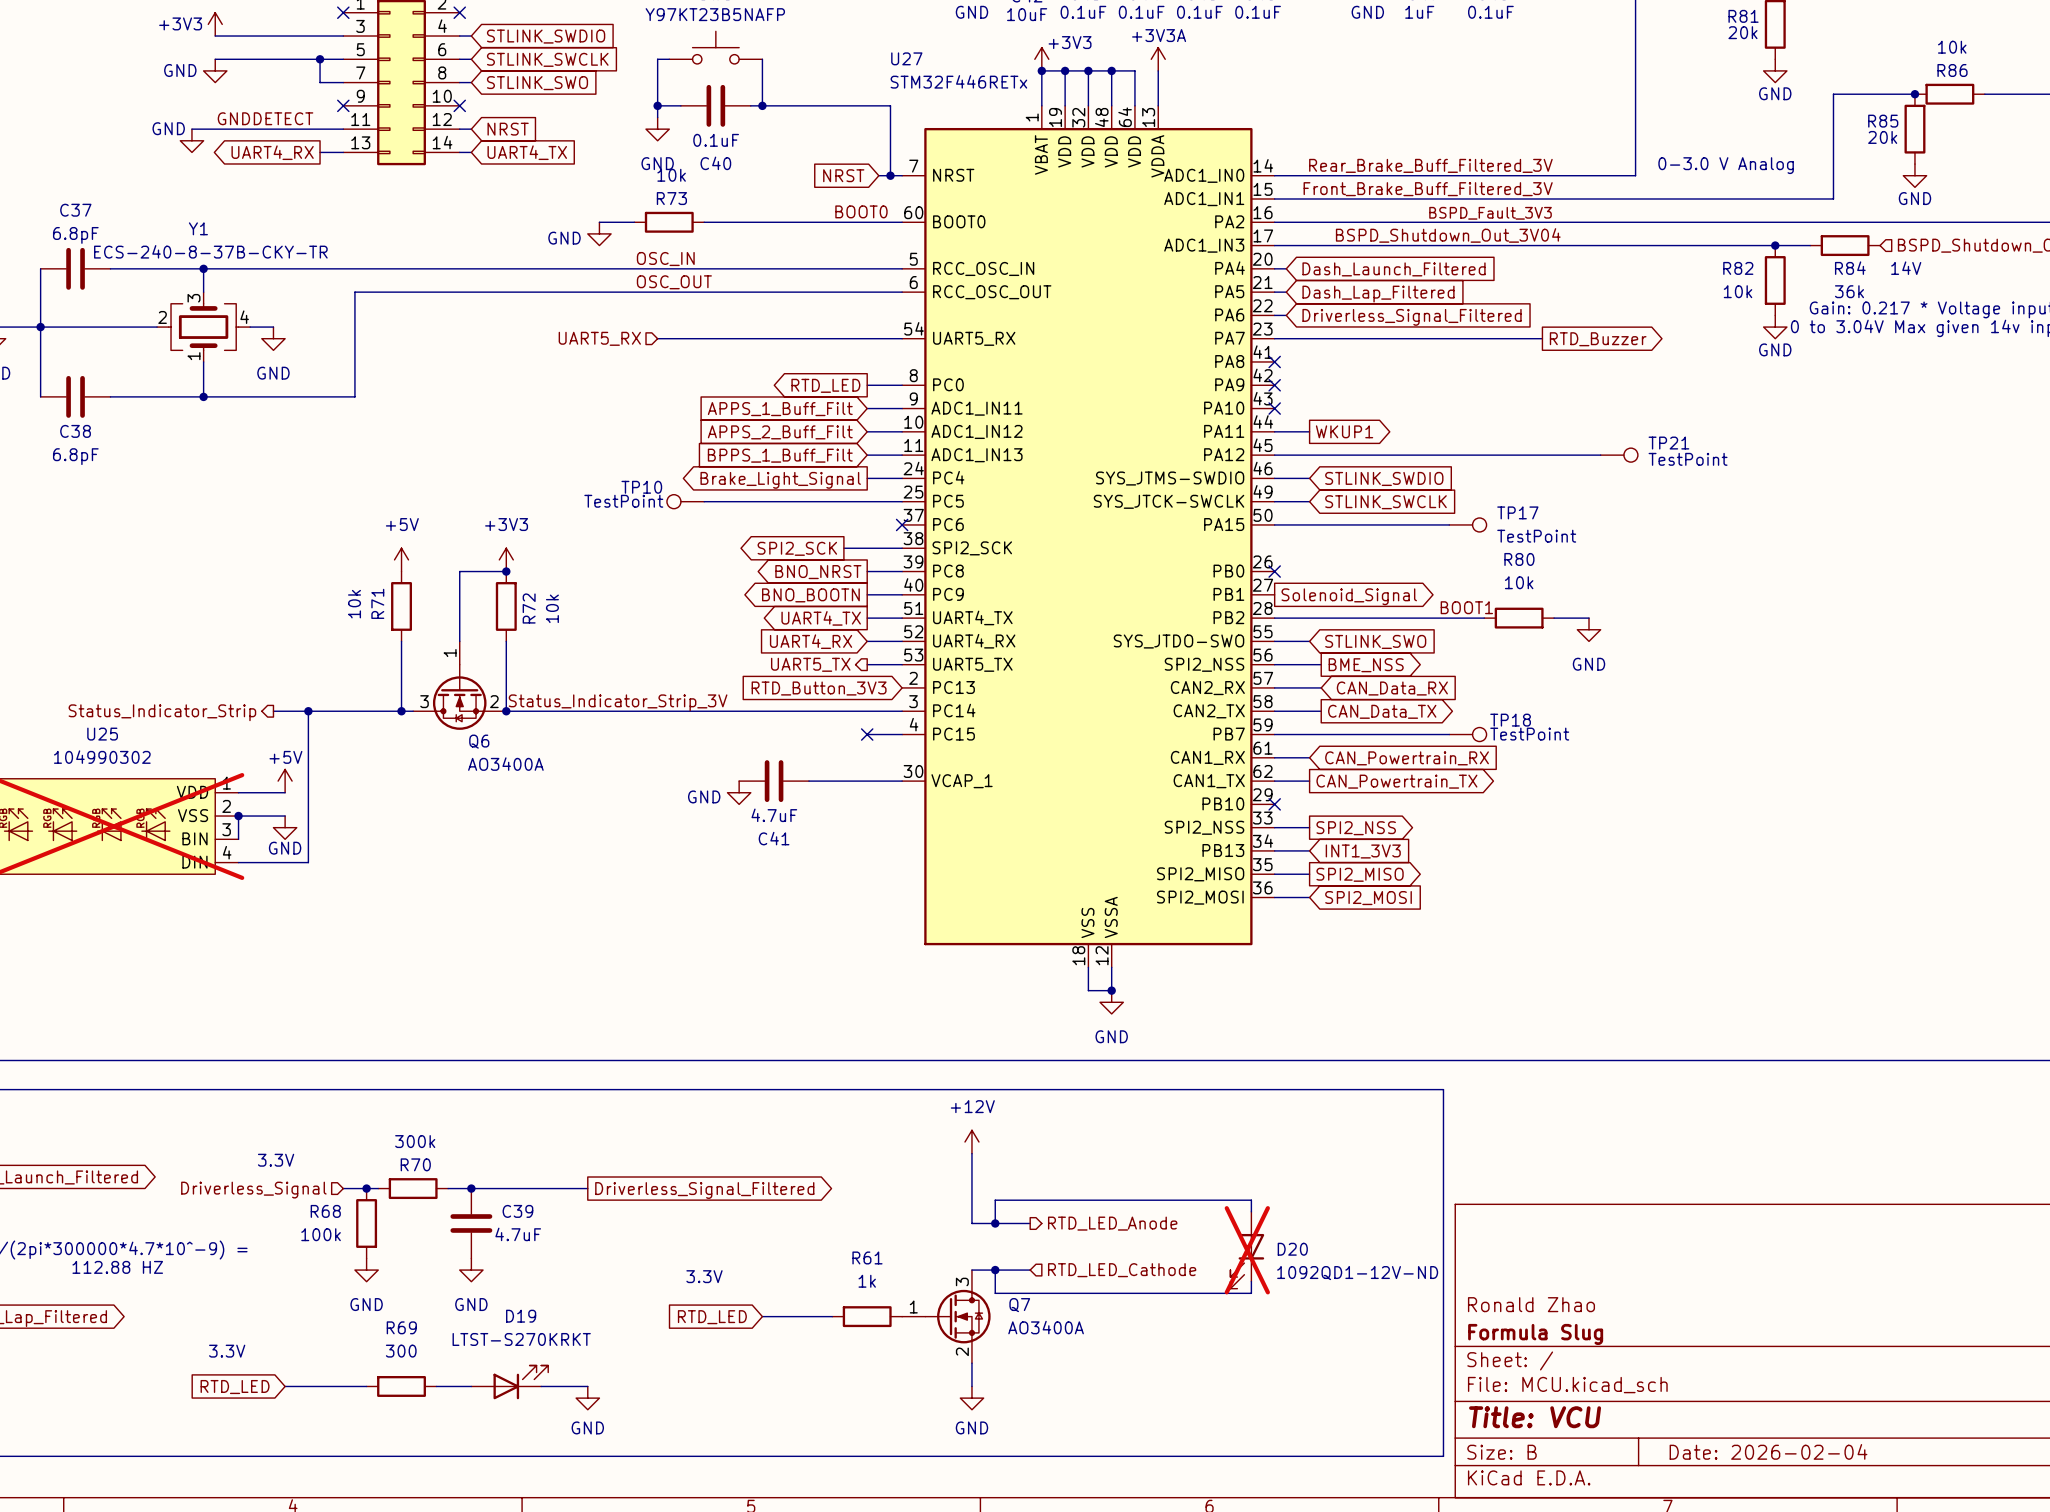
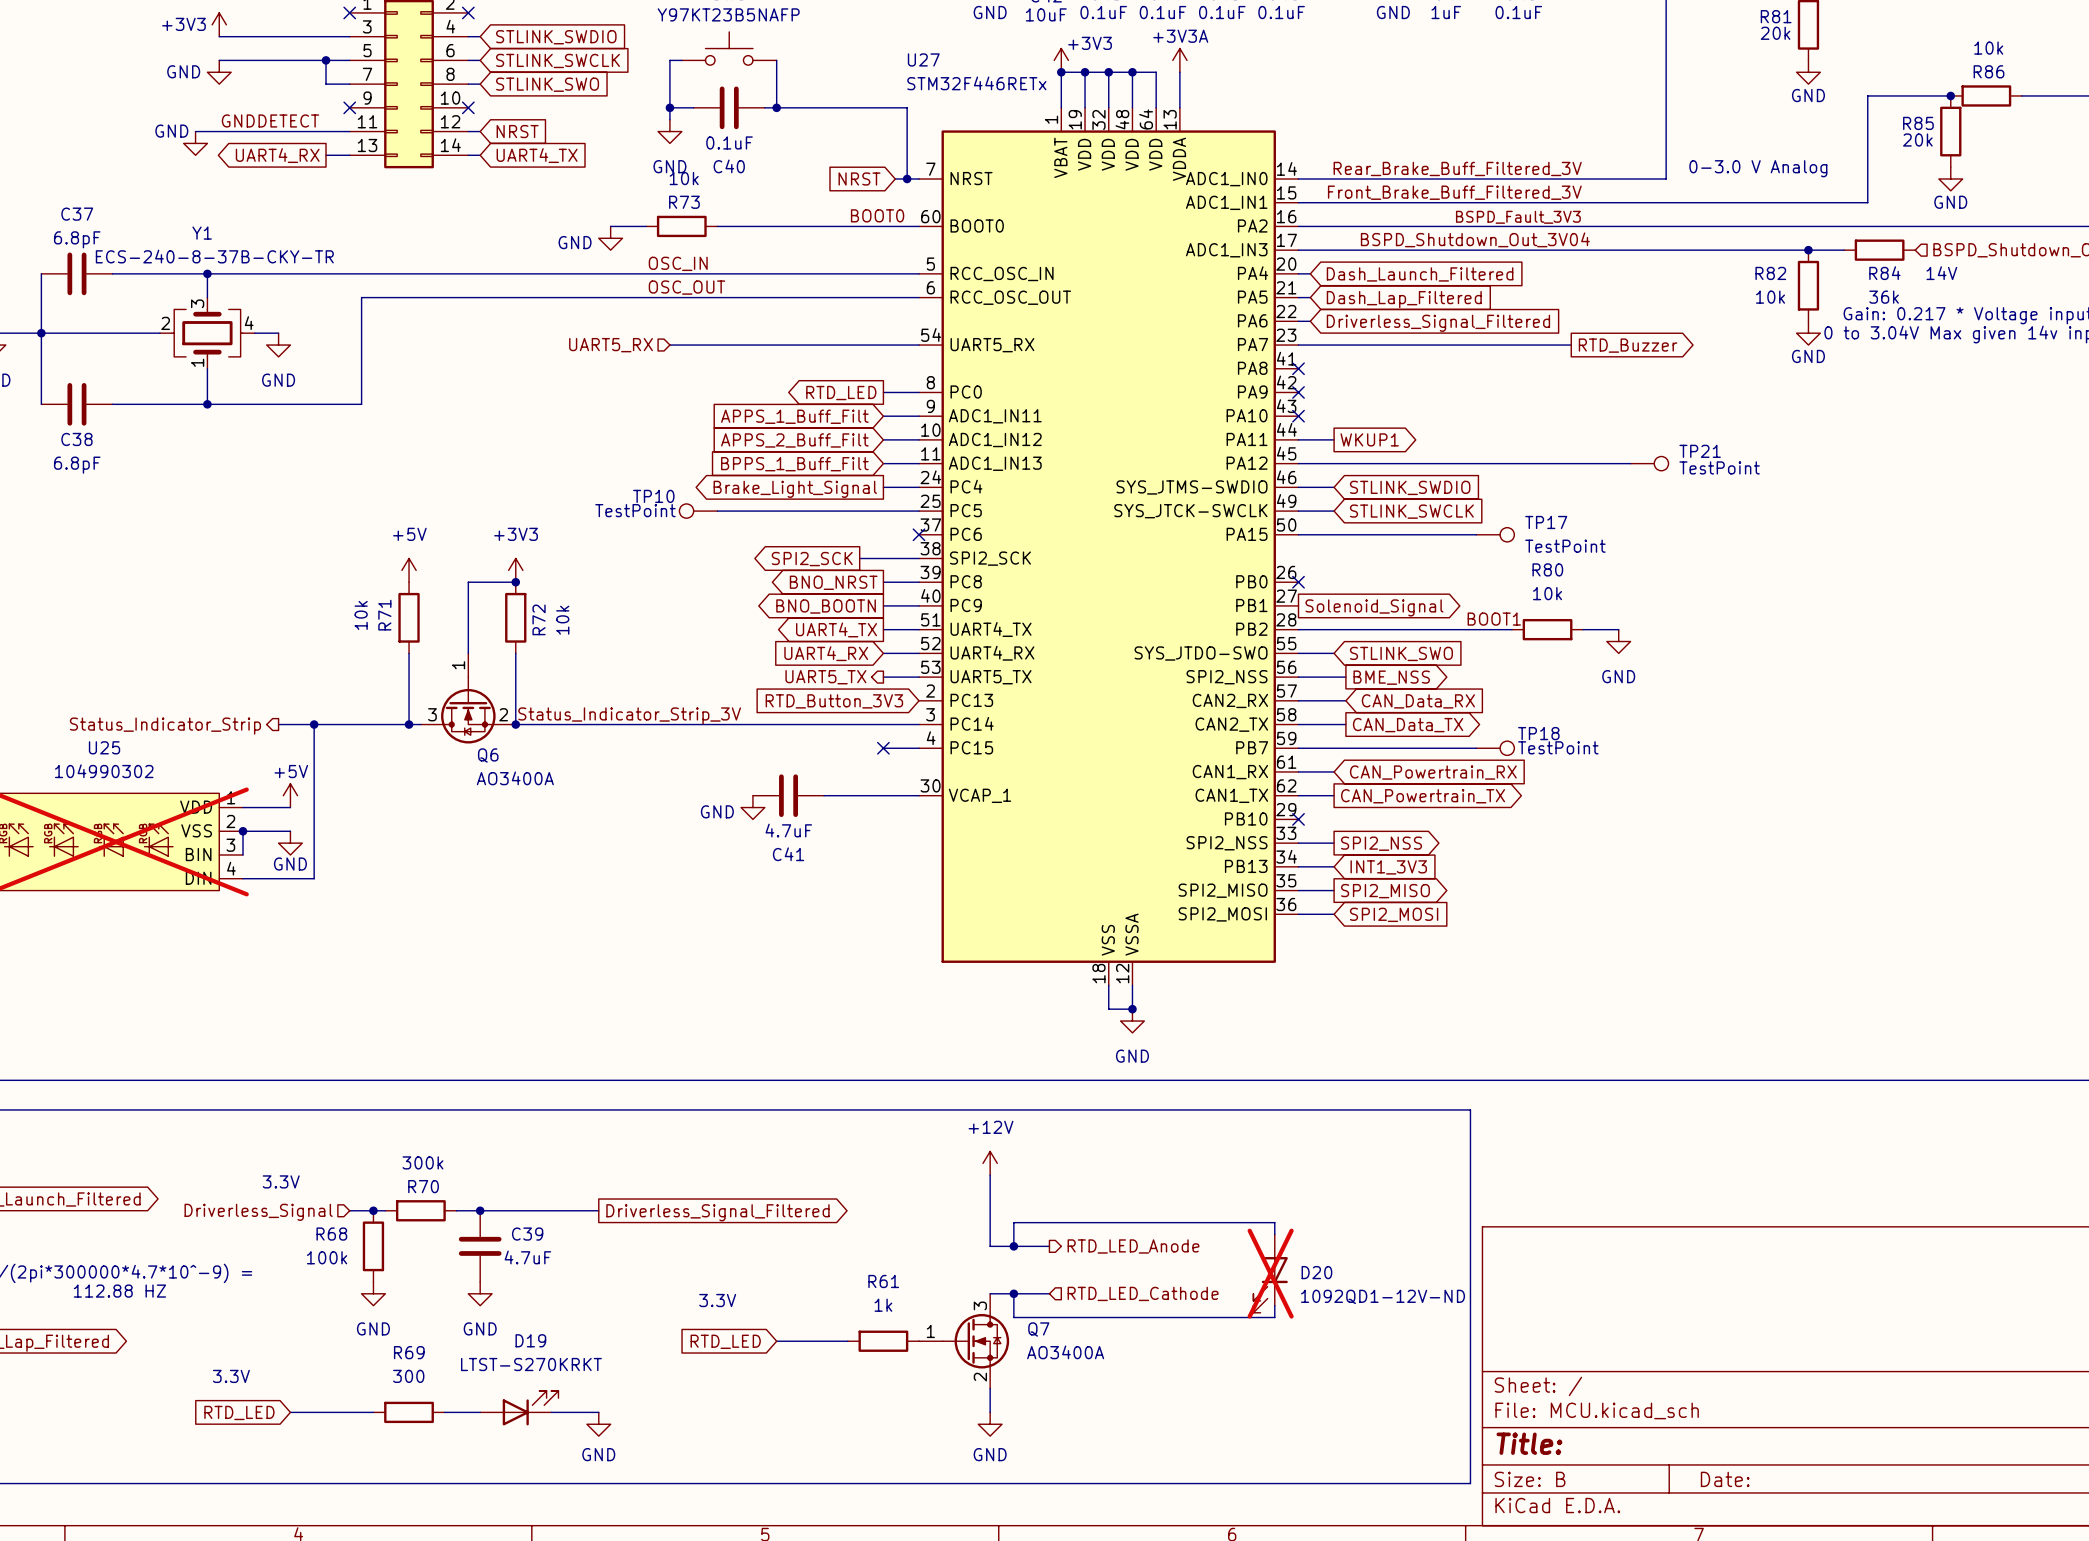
title block: Ronald Zhao (1531, 1304) -> none
title block: Formula Slug (1535, 1334) -> none
title block: Title: VCU (1535, 1417) -> Title: (1529, 1443)
title block: Date: 2026-02-04 (1768, 1451) -> Date: (1725, 1479)

